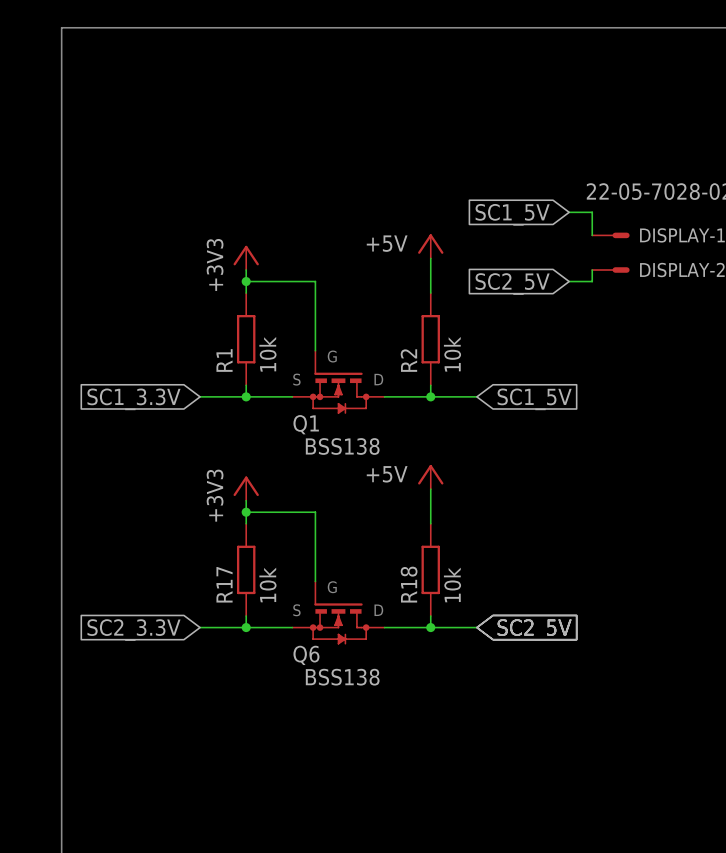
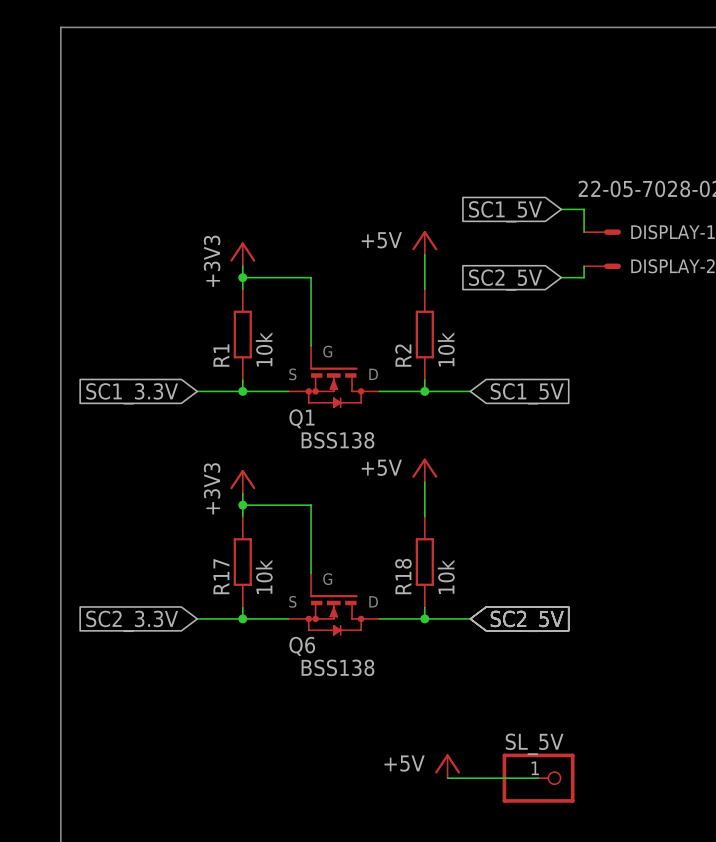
power symbol: none -> +5V (447, 766)
wire: none -> (447, 778) (538, 778)
SL_5V: none -> (538, 778)

